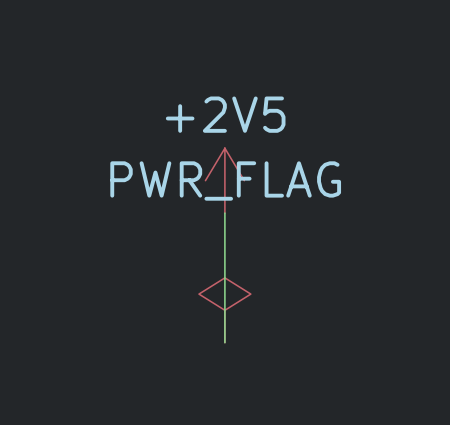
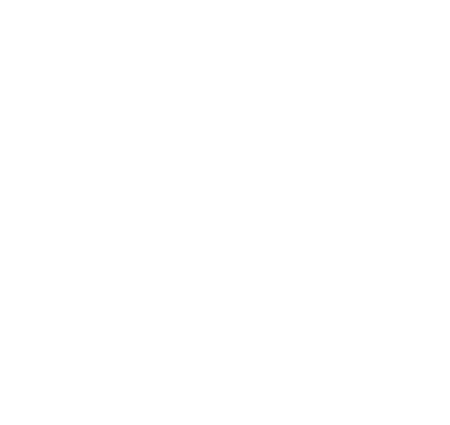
power symbol: +2V5 (224, 180) -> none
wire: (224, 213) (224, 342) -> none
power symbol: PWR_FLAG (224, 310) -> none

